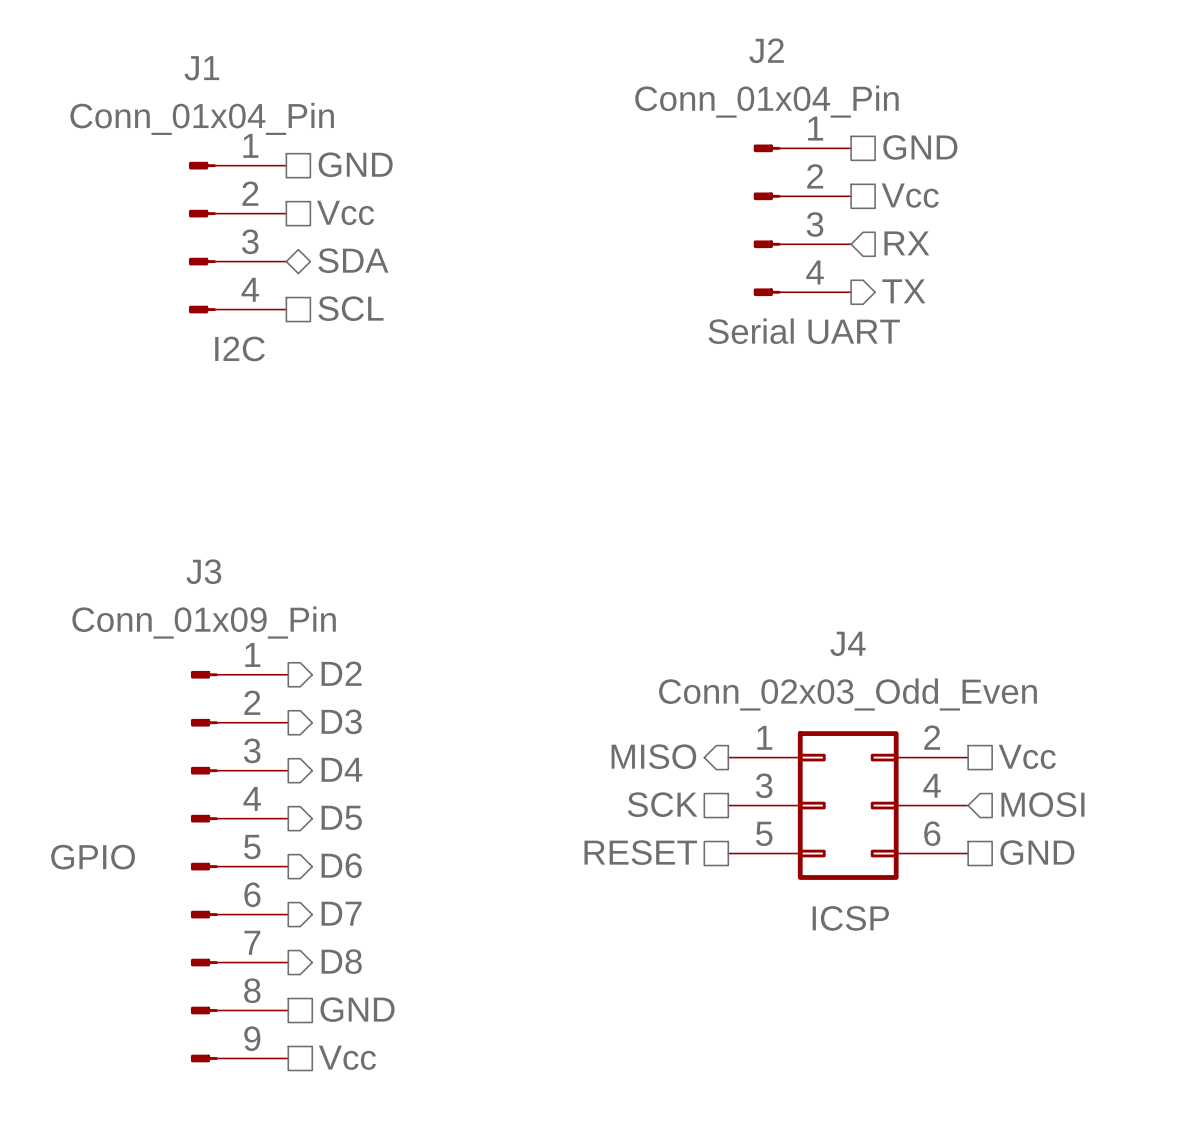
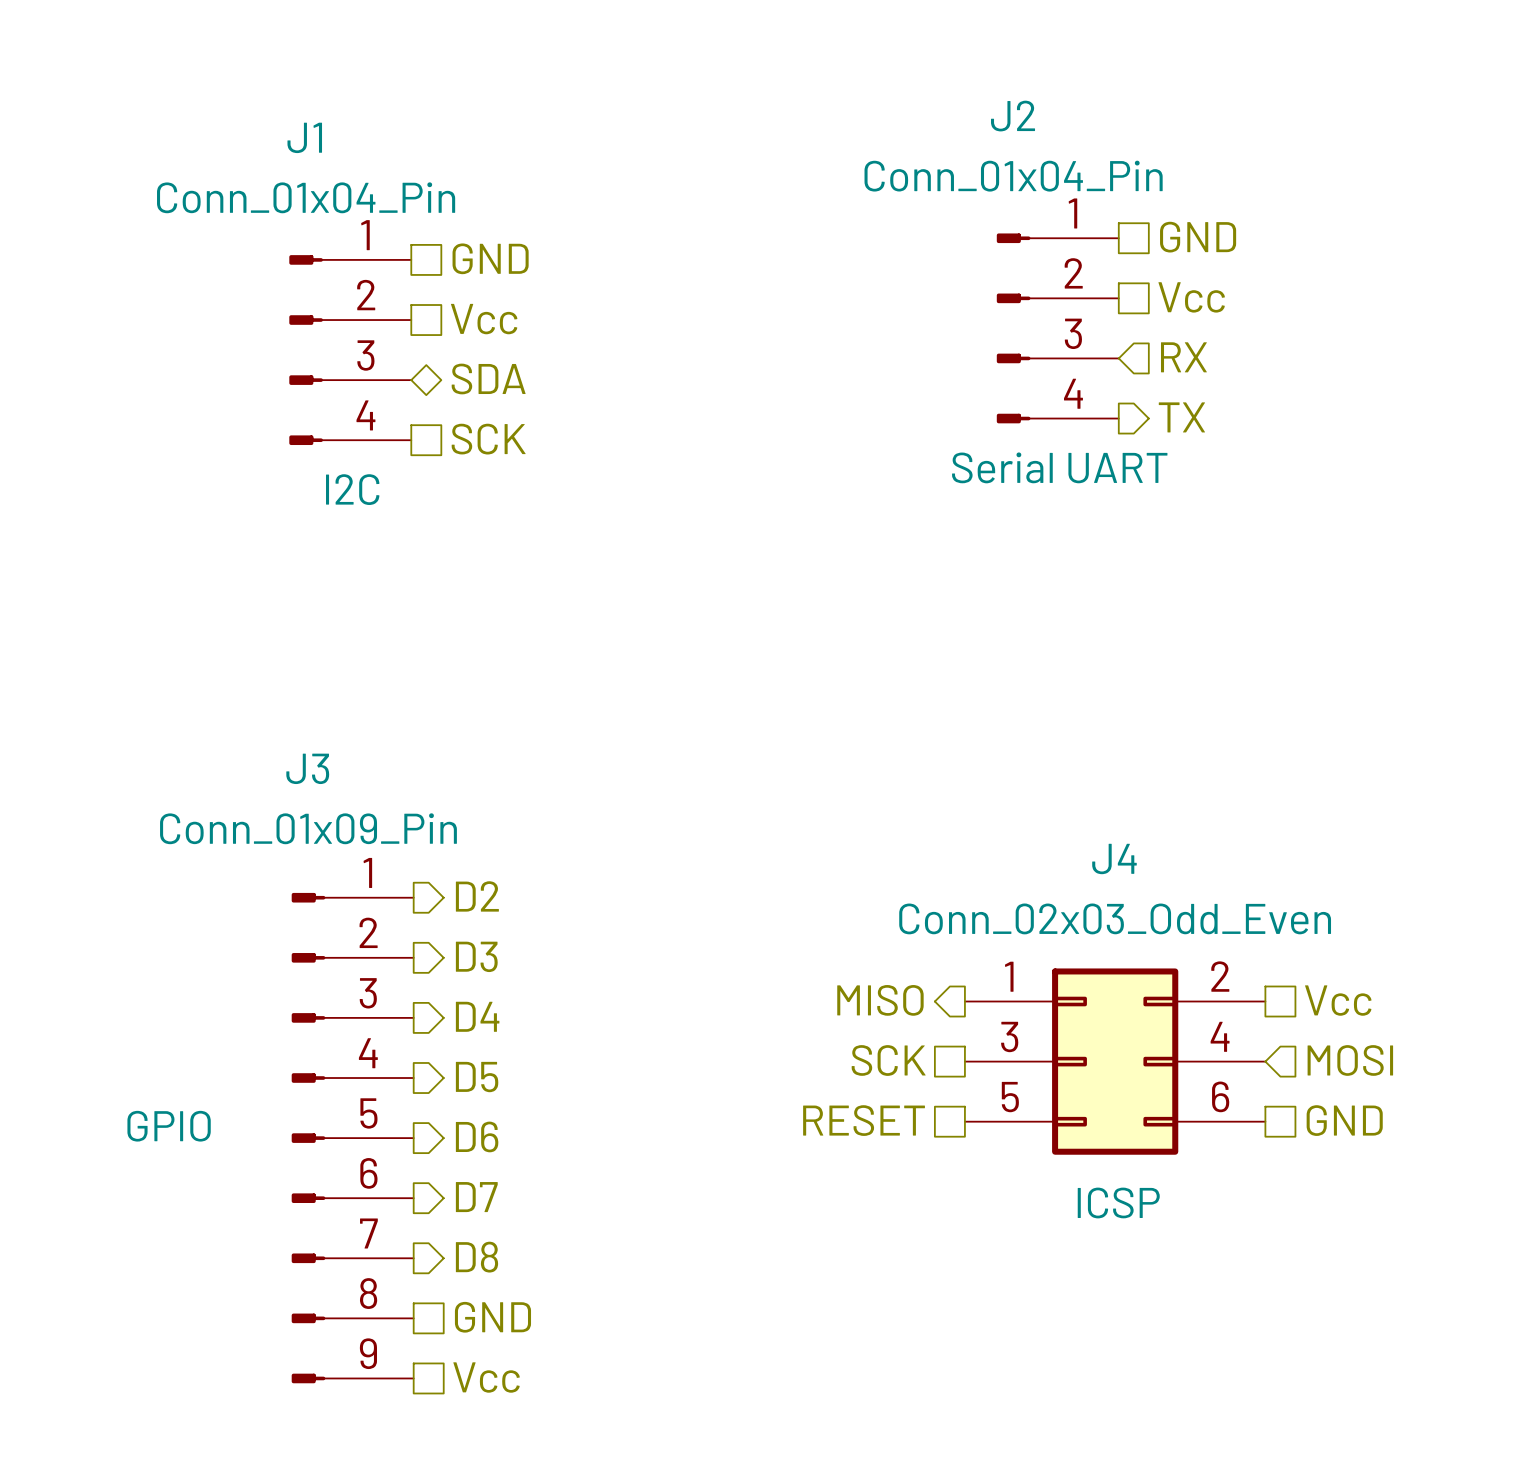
hierarchical label: SCL (350, 308) -> SCK (488, 439)

